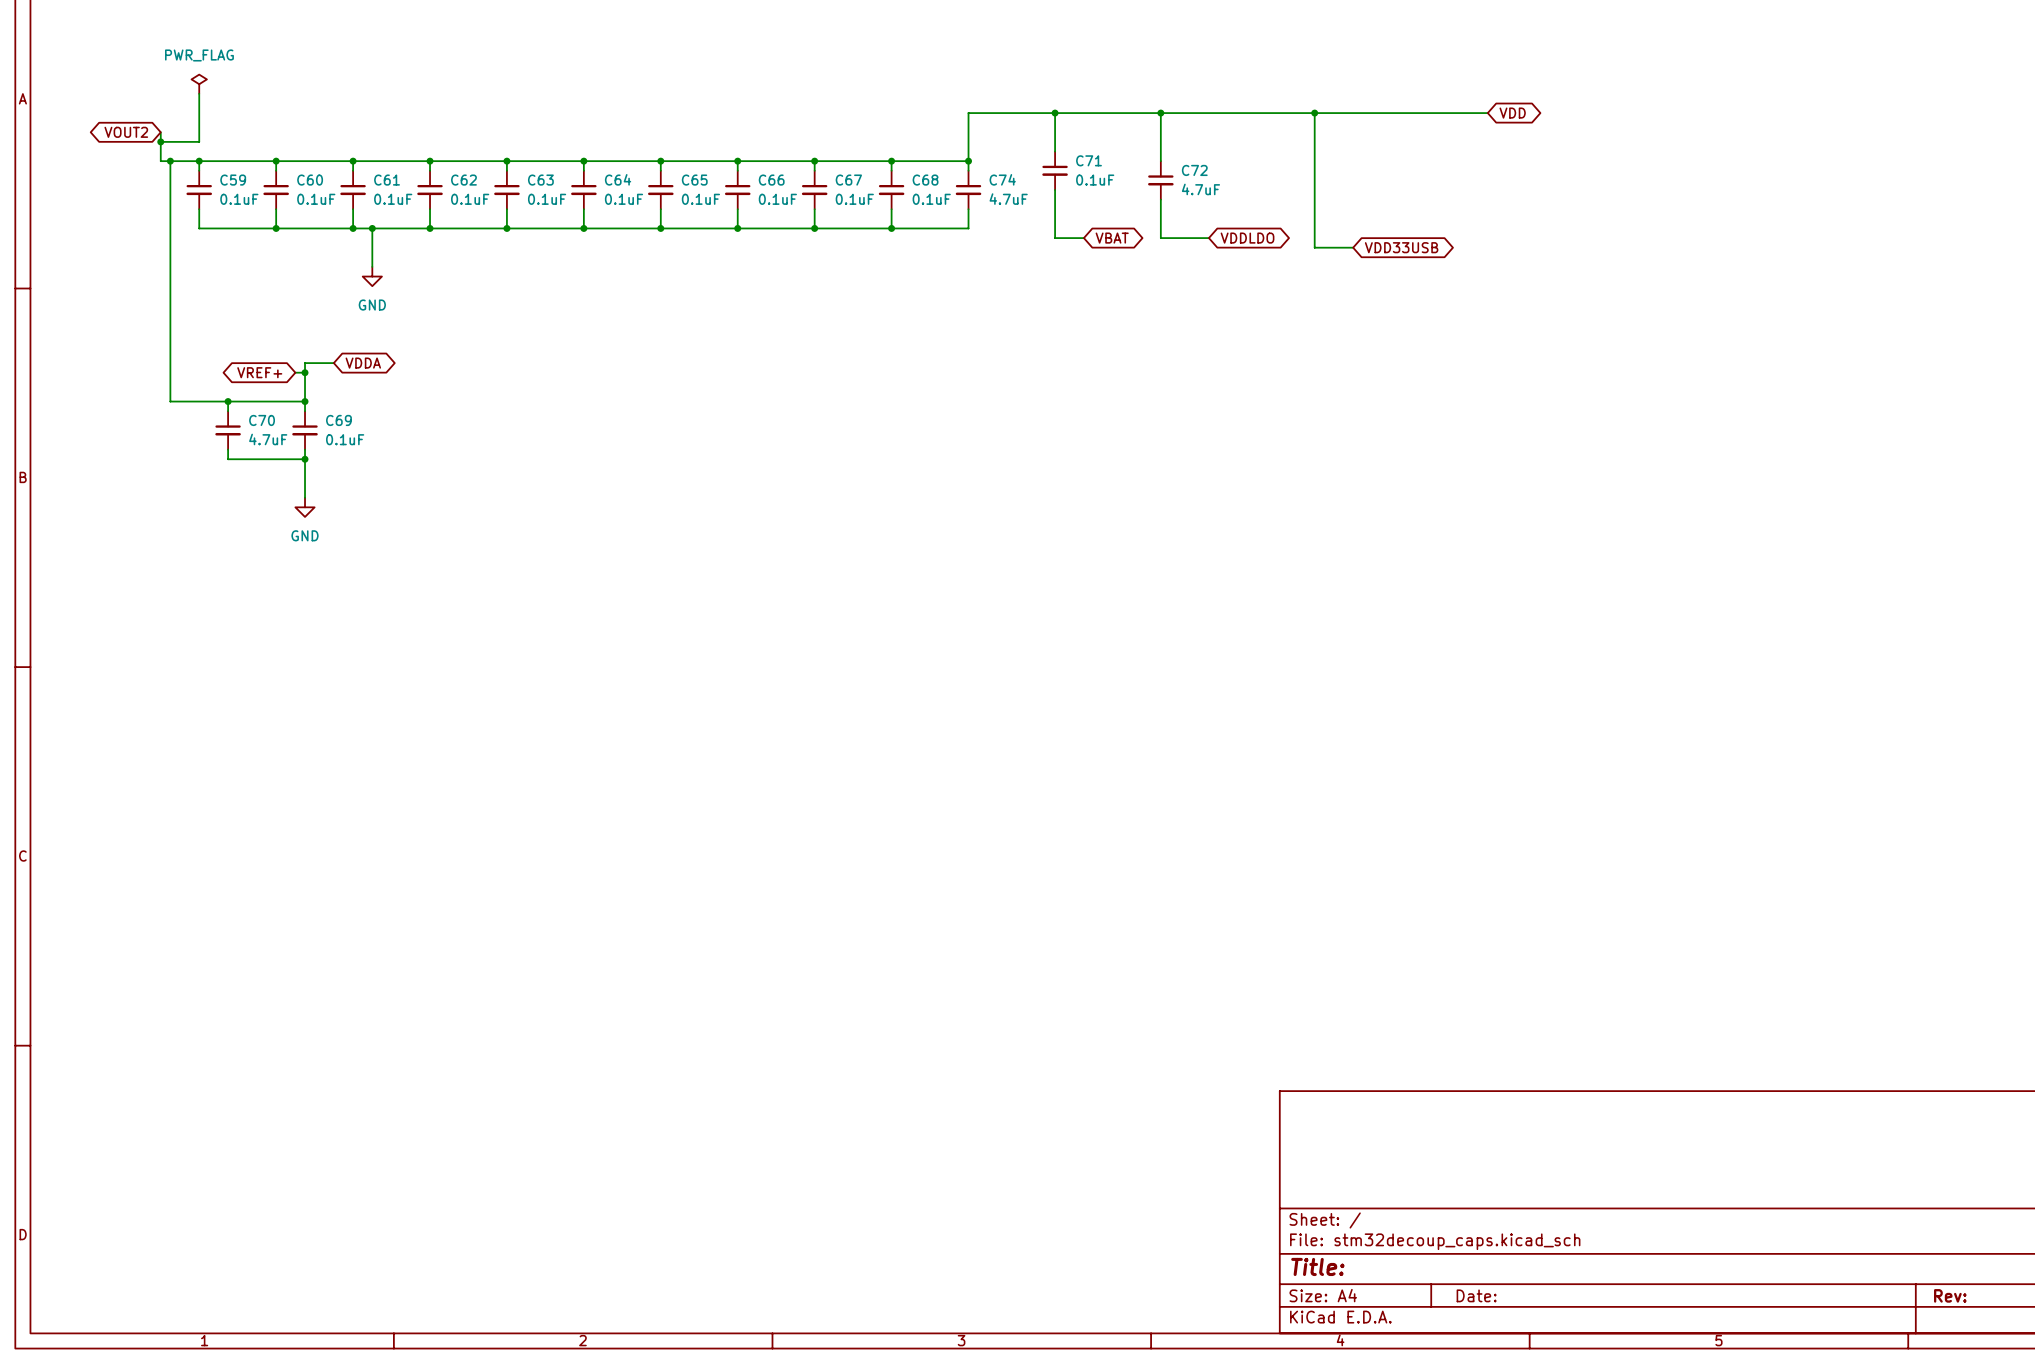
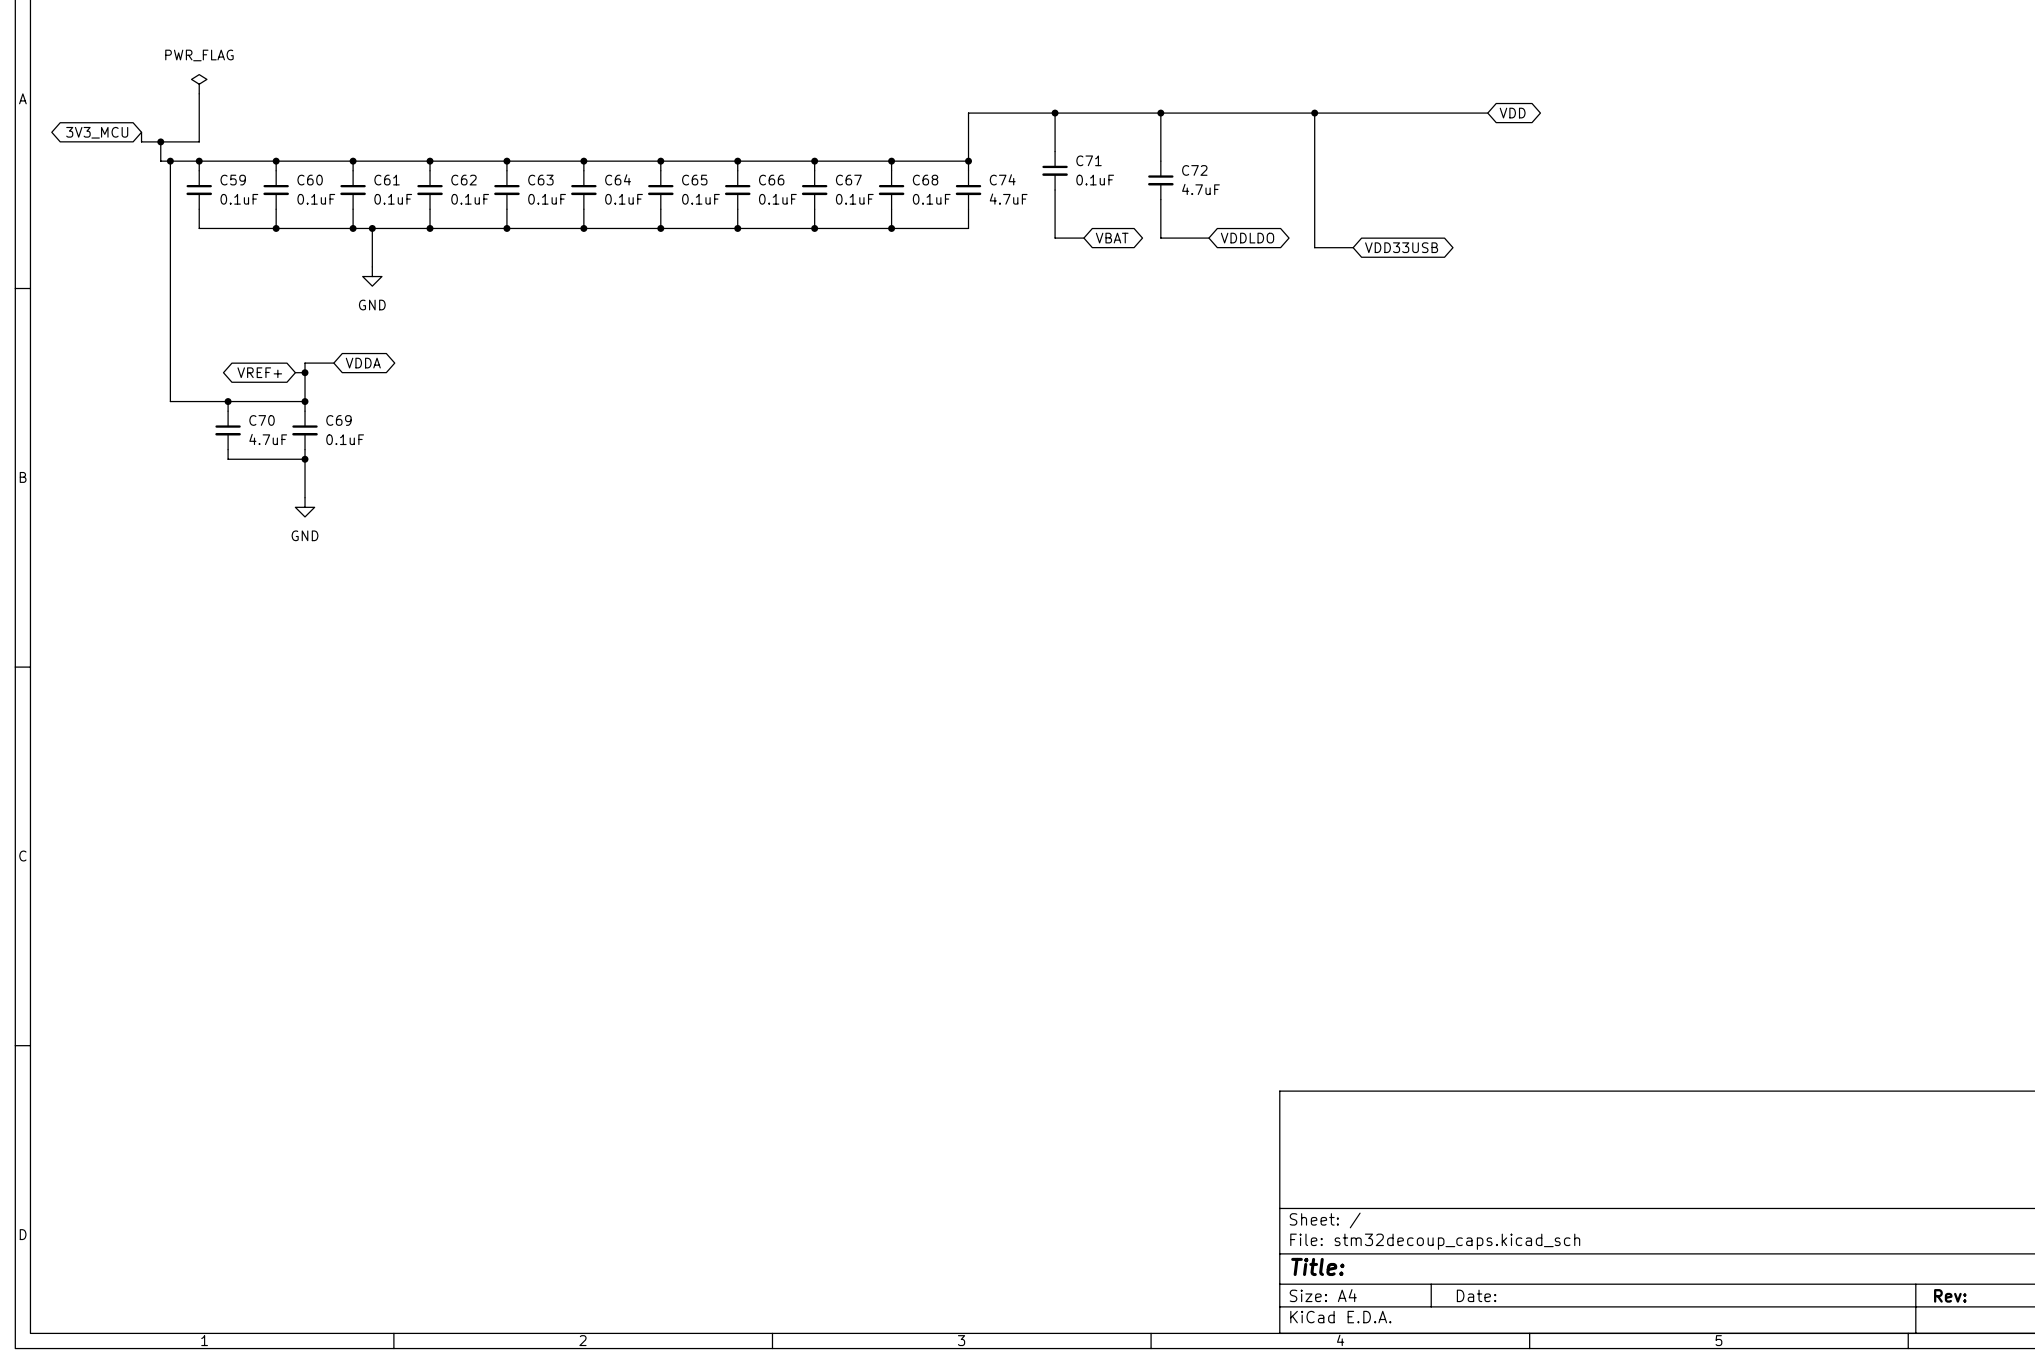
global label: none -> 3V3_MCU (97, 132)
global label: VOUT2 (126, 132) -> none

